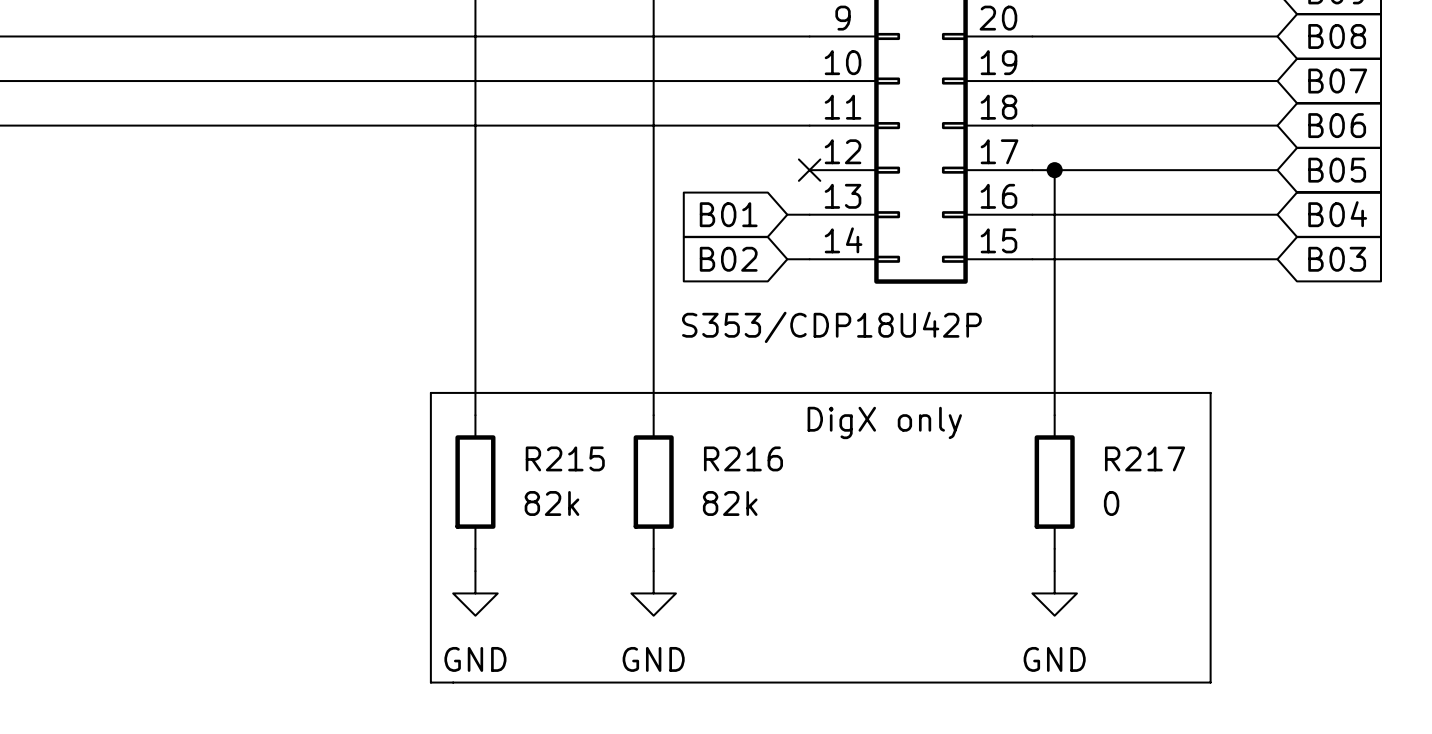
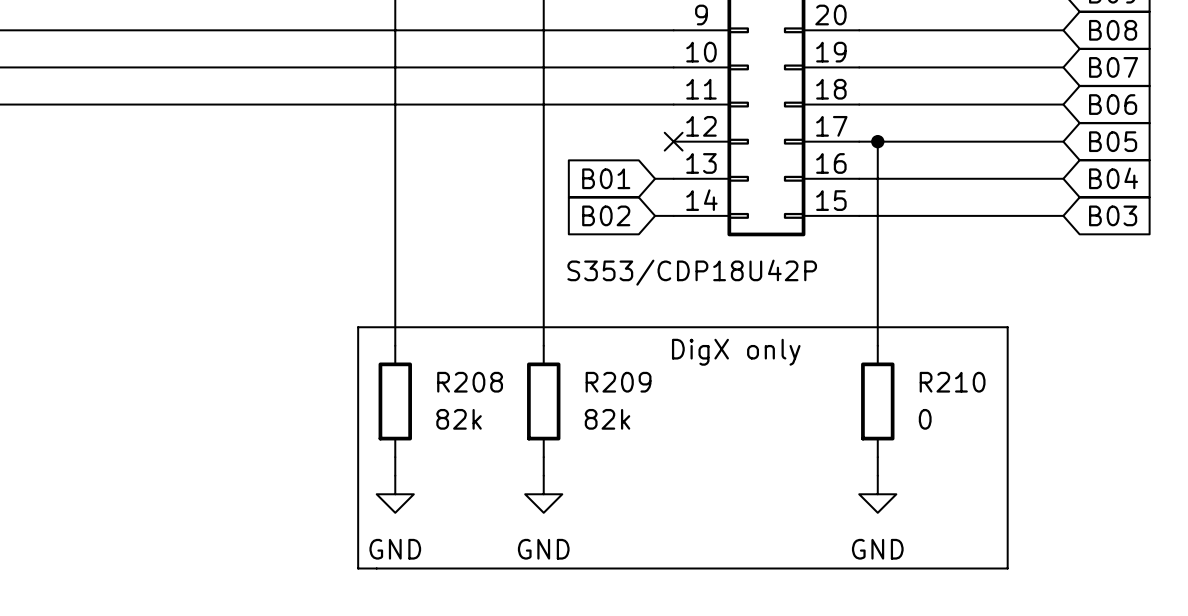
R215 name: R215 (565, 458) -> R208 (470, 382)
R216 name: R216 (743, 458) -> R209 (618, 382)
R217 name: R217 (1145, 458) -> R210 (952, 382)

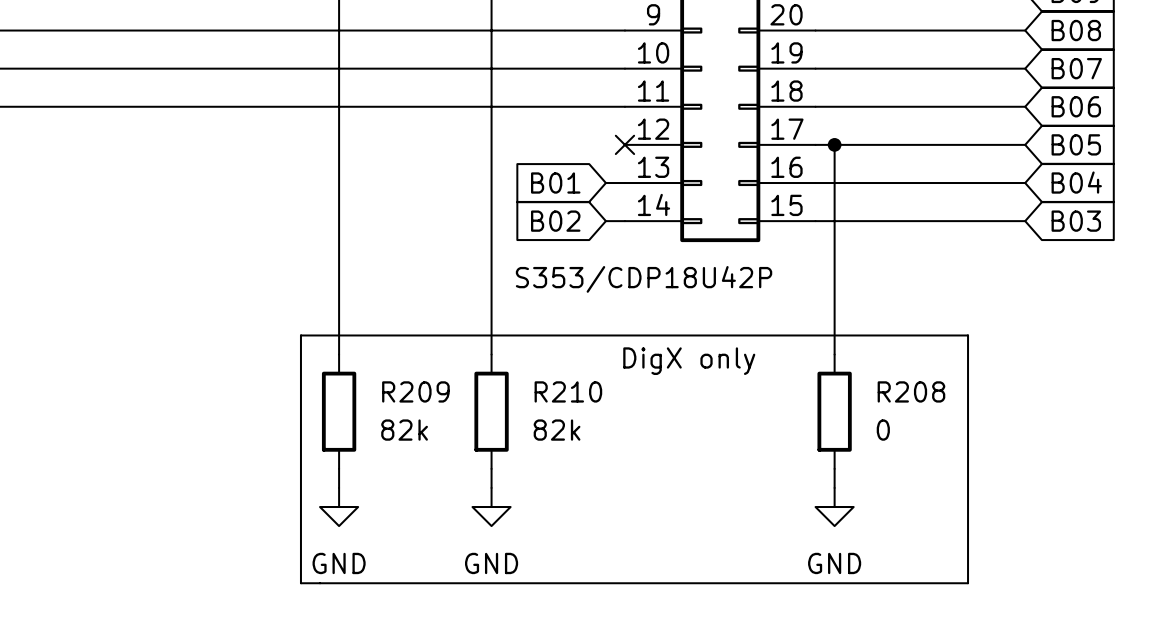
R208 name: R208 (470, 382) -> R209 (415, 391)
R209 name: R209 (618, 382) -> R210 (568, 391)
R210 name: R210 (952, 382) -> R208 (911, 391)

